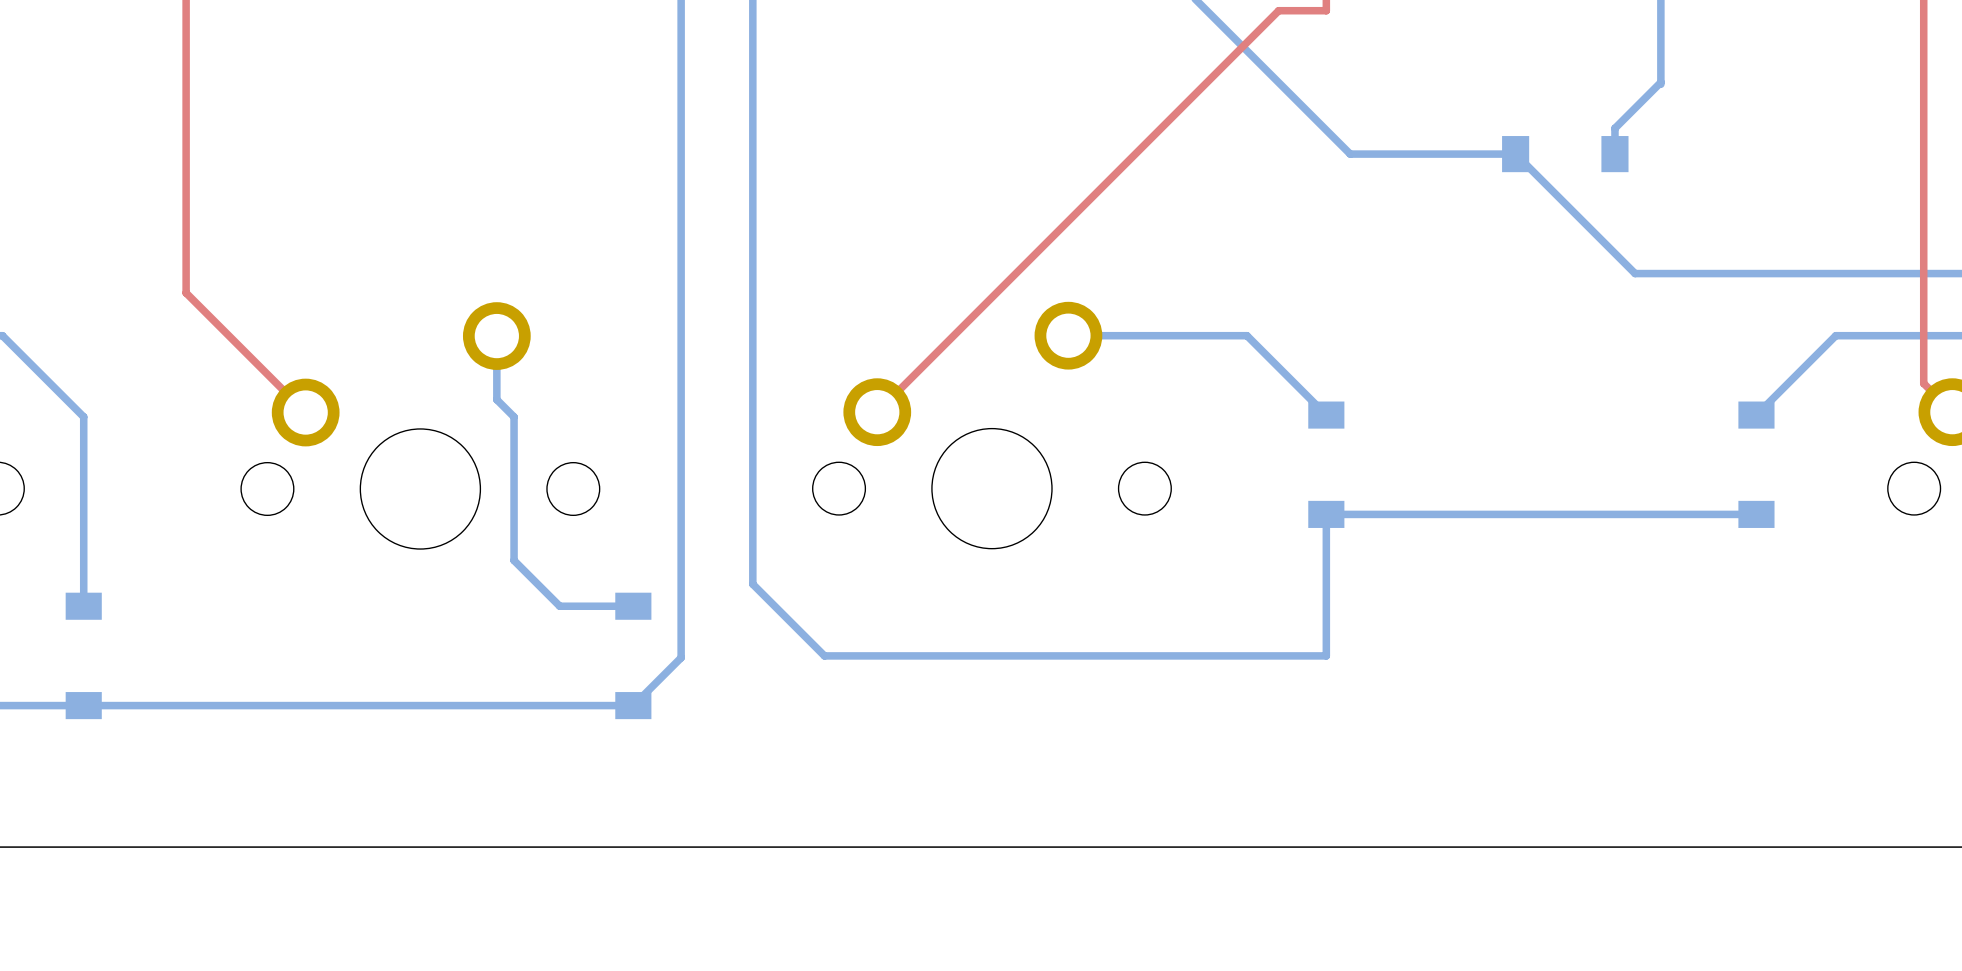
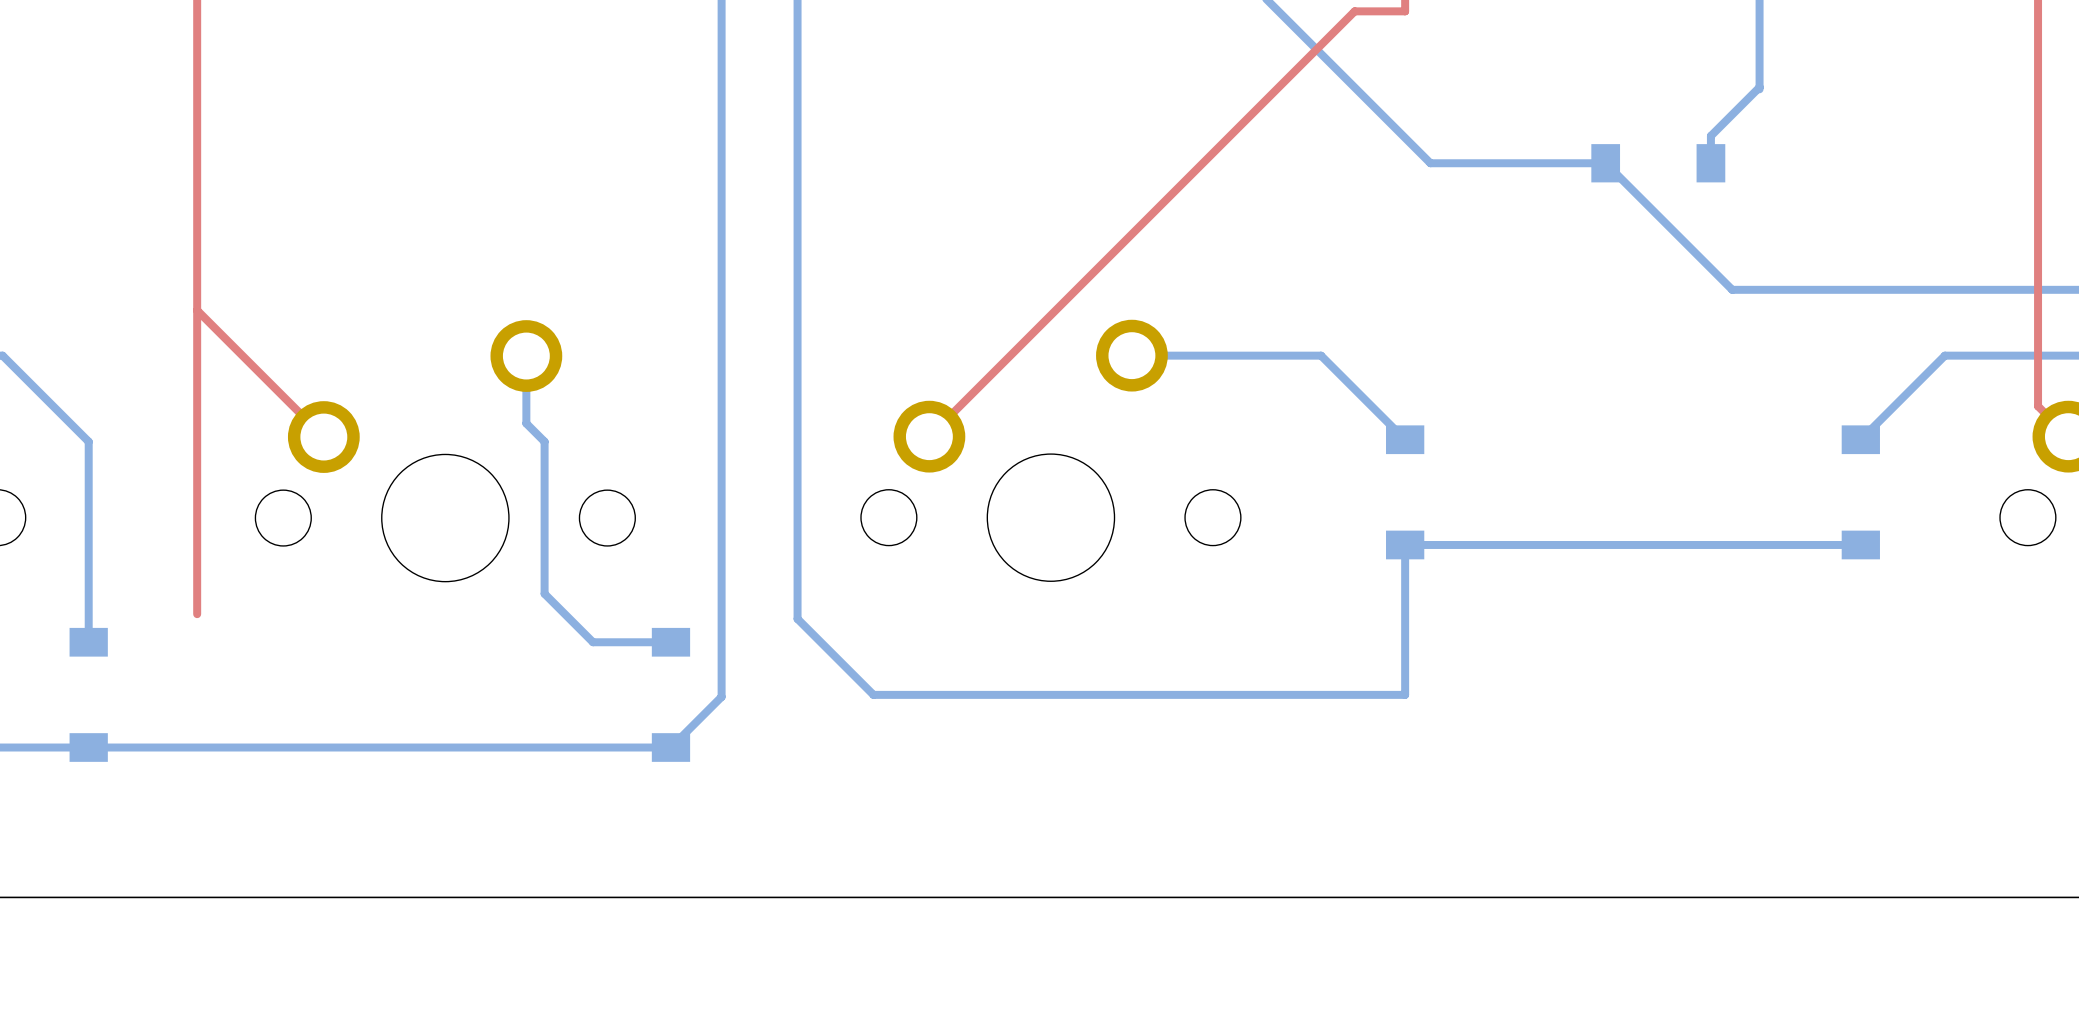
top track: none -> (197, 310) (197, 614)

